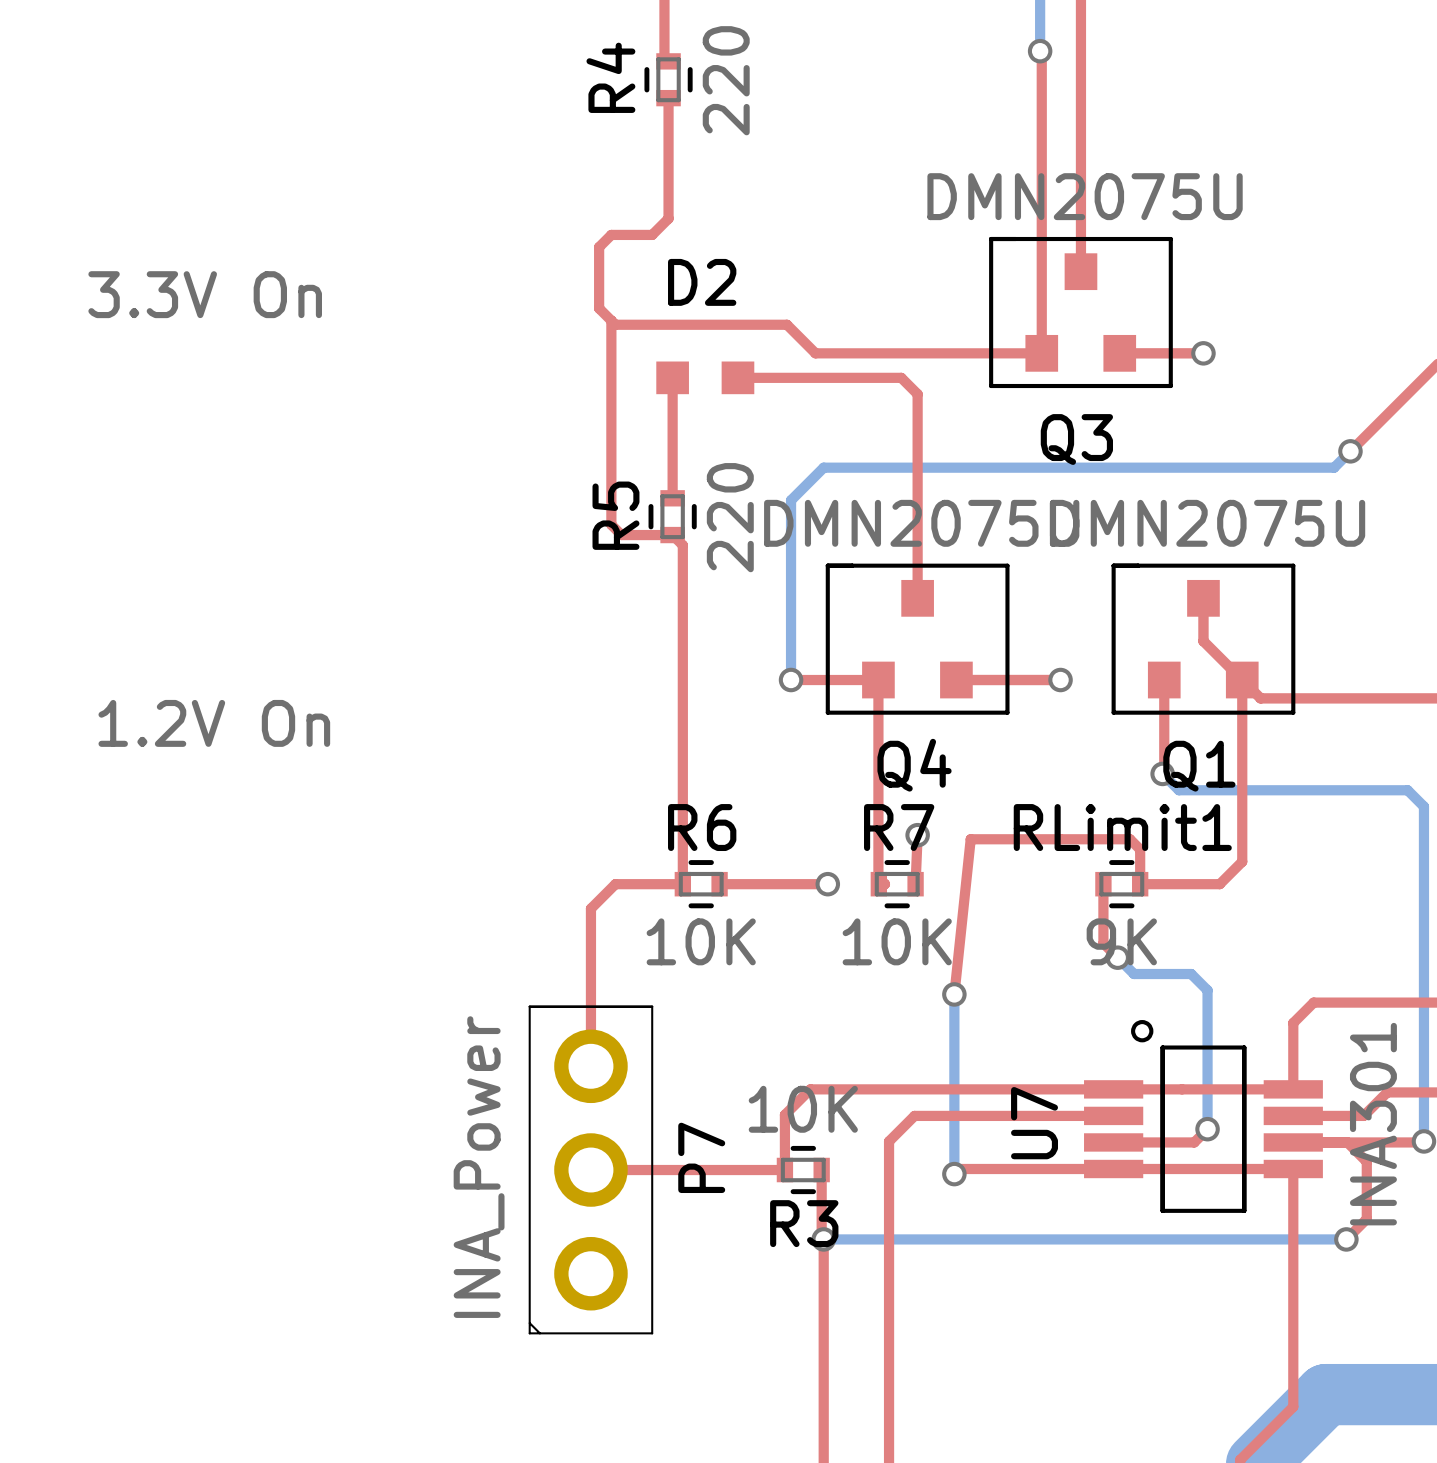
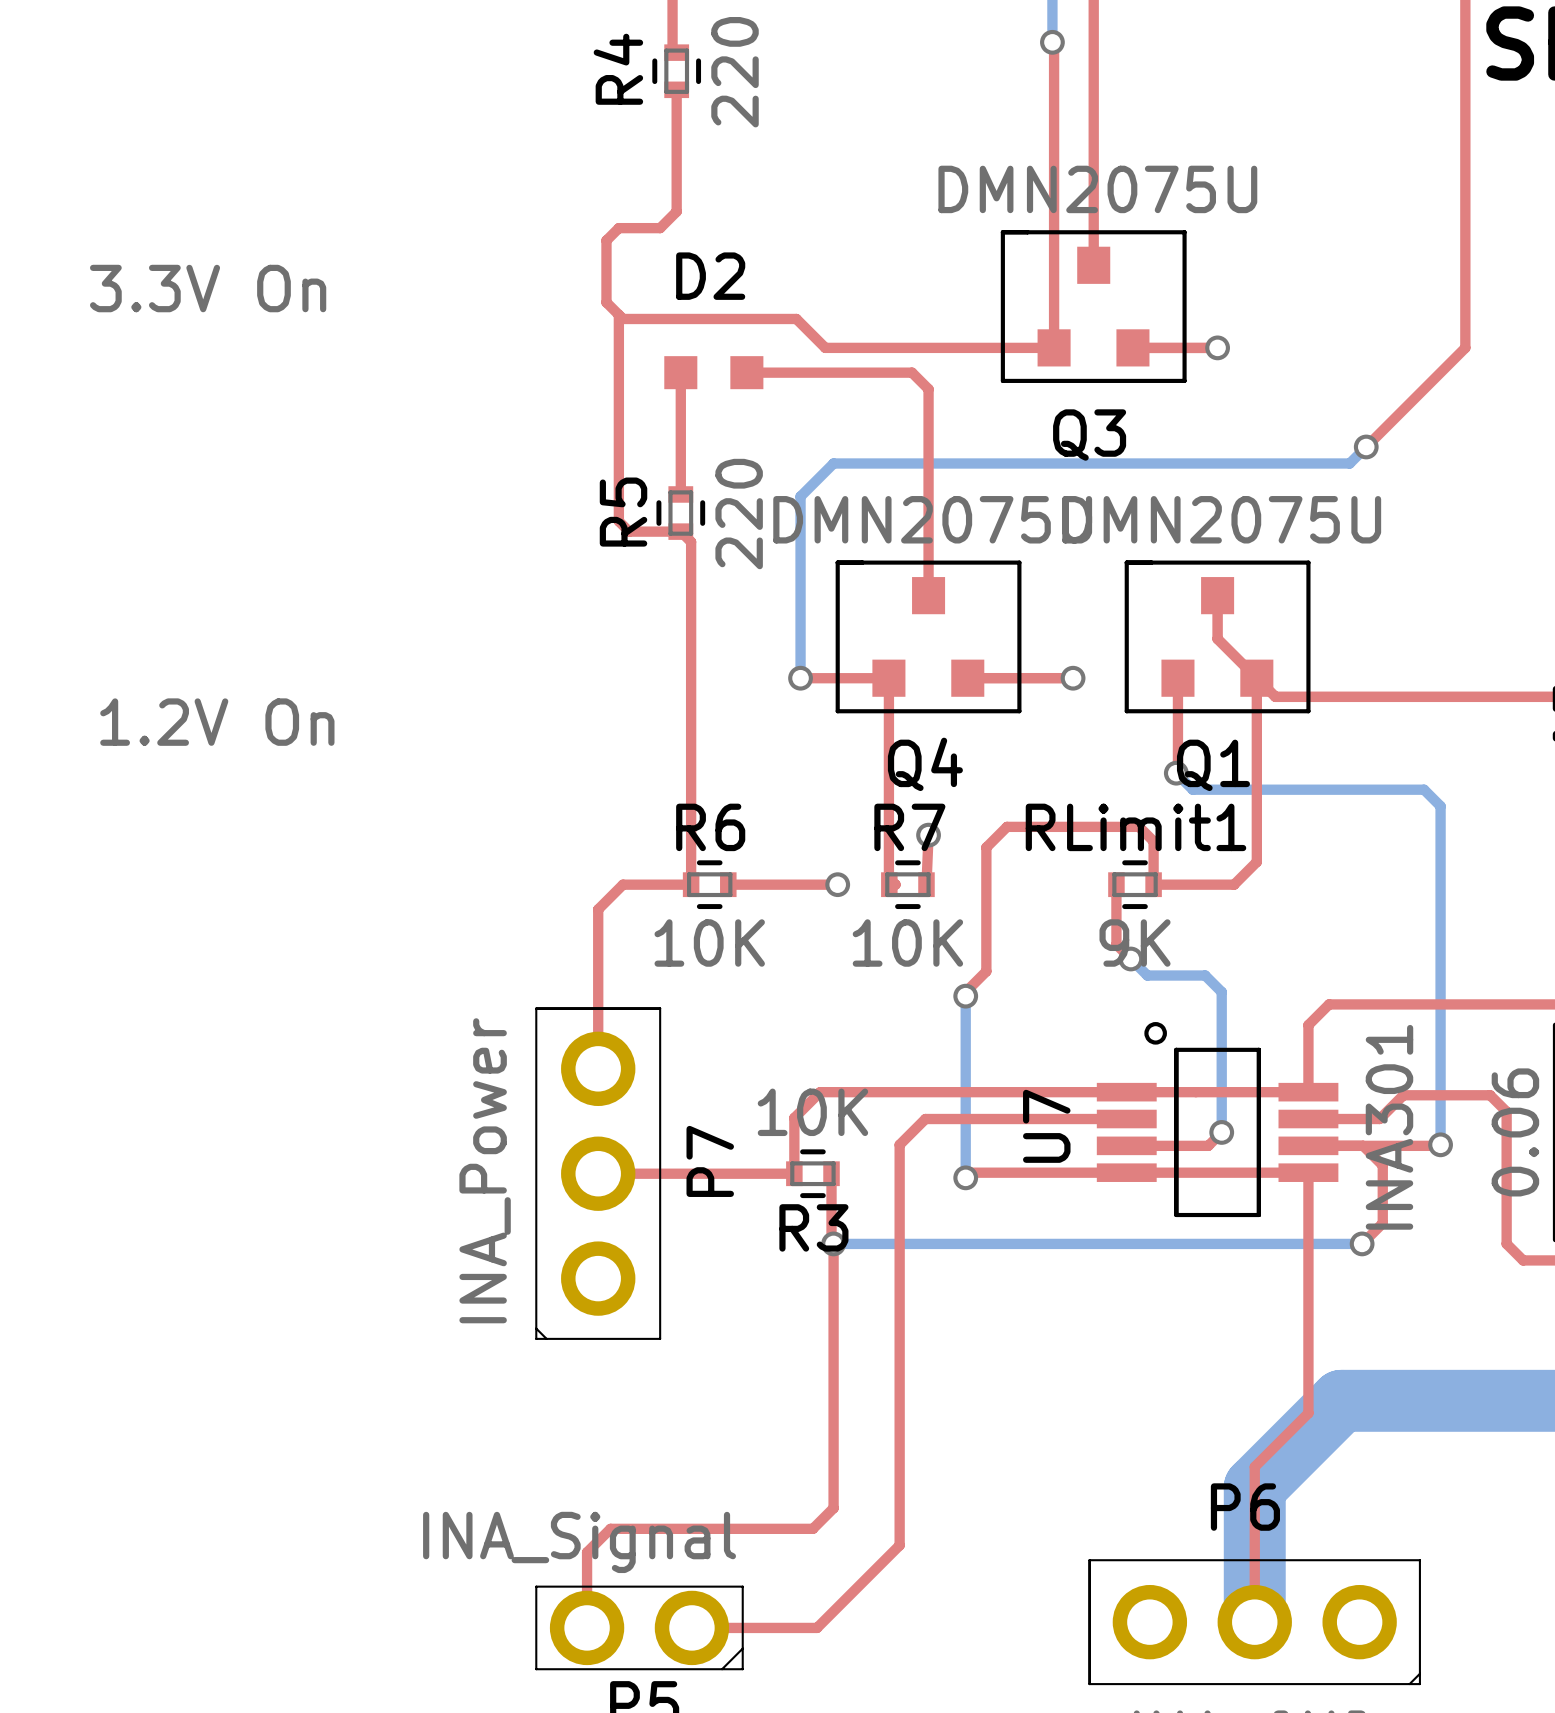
top track: (1140, 849) (1129, 839) (970, 839) (954, 994) -> (1153, 849) (1153, 841) (1139, 826) (1007, 826) (986, 847) (986, 971) (965, 992)

